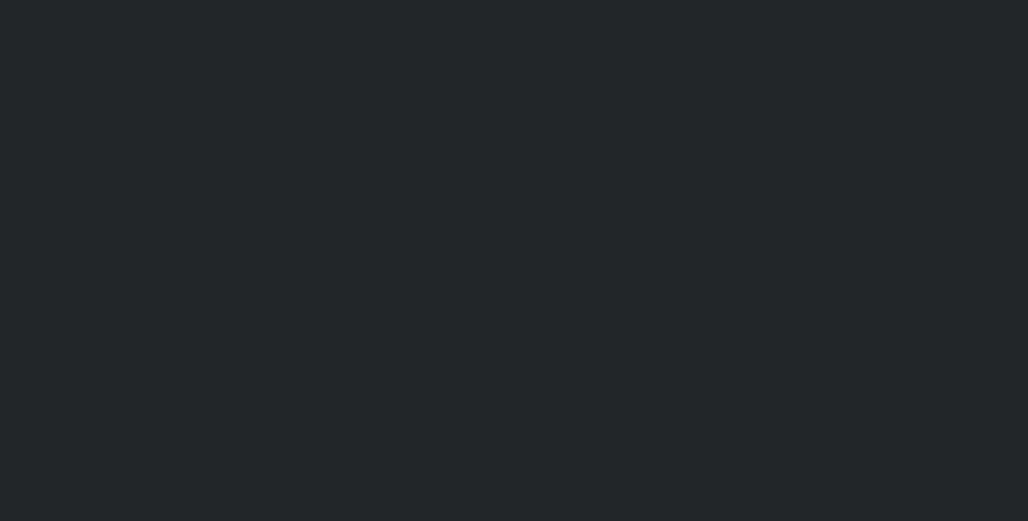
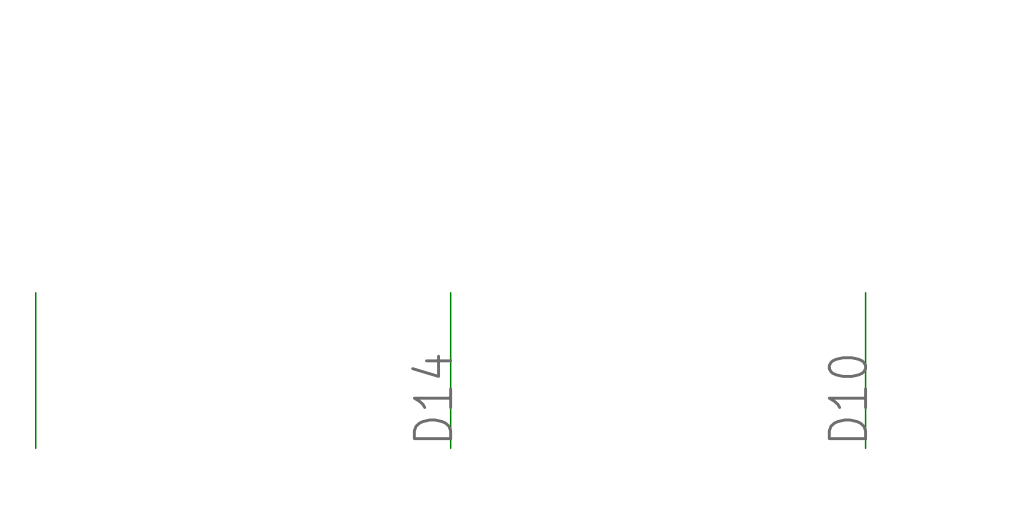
wire: none -> (35, 292) (35, 448)
wire: none -> (450, 292) (450, 448)
wire: none -> (865, 292) (865, 448)
label: none -> D14 (431, 397)
label: none -> D10 (847, 398)

